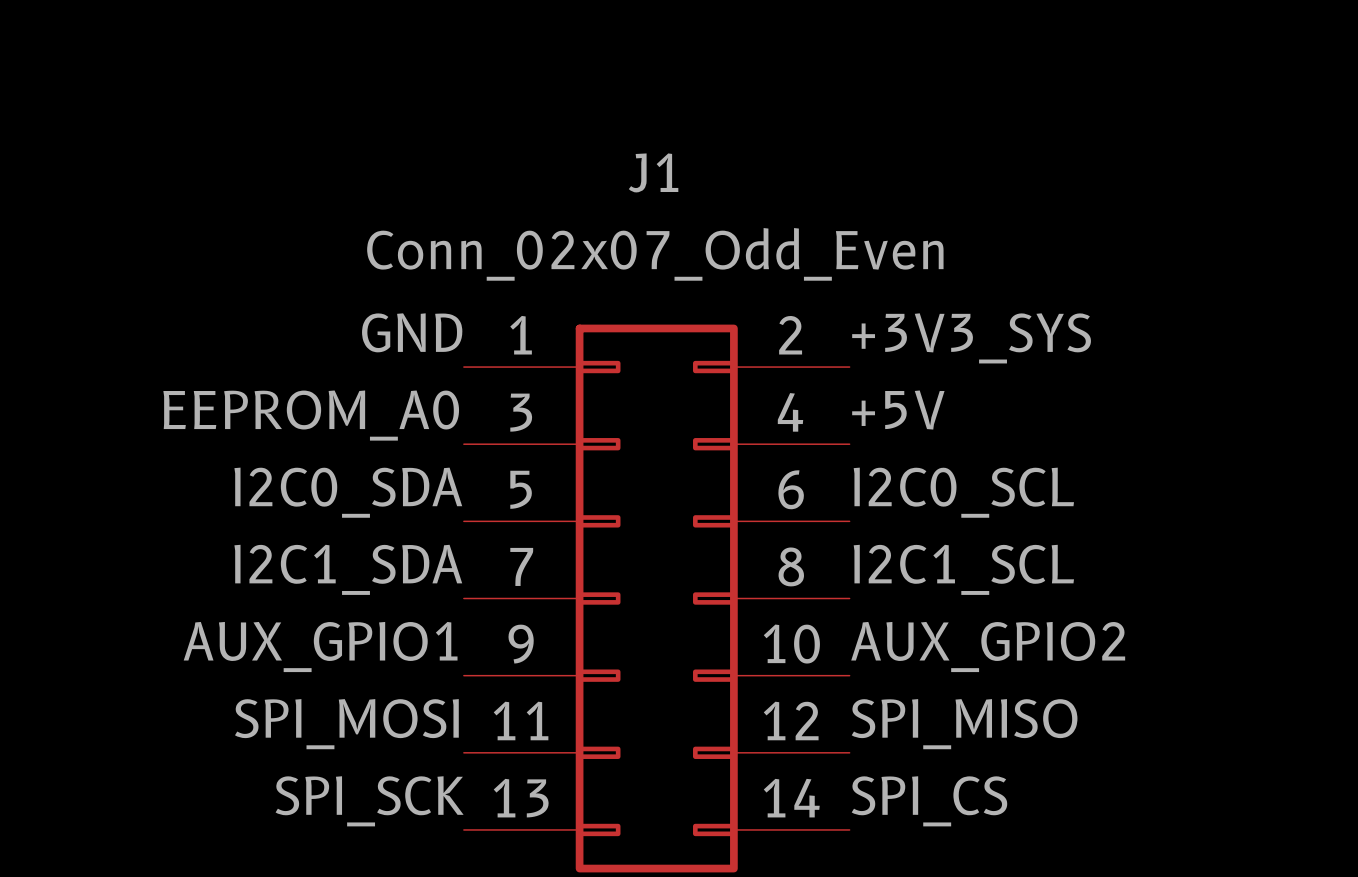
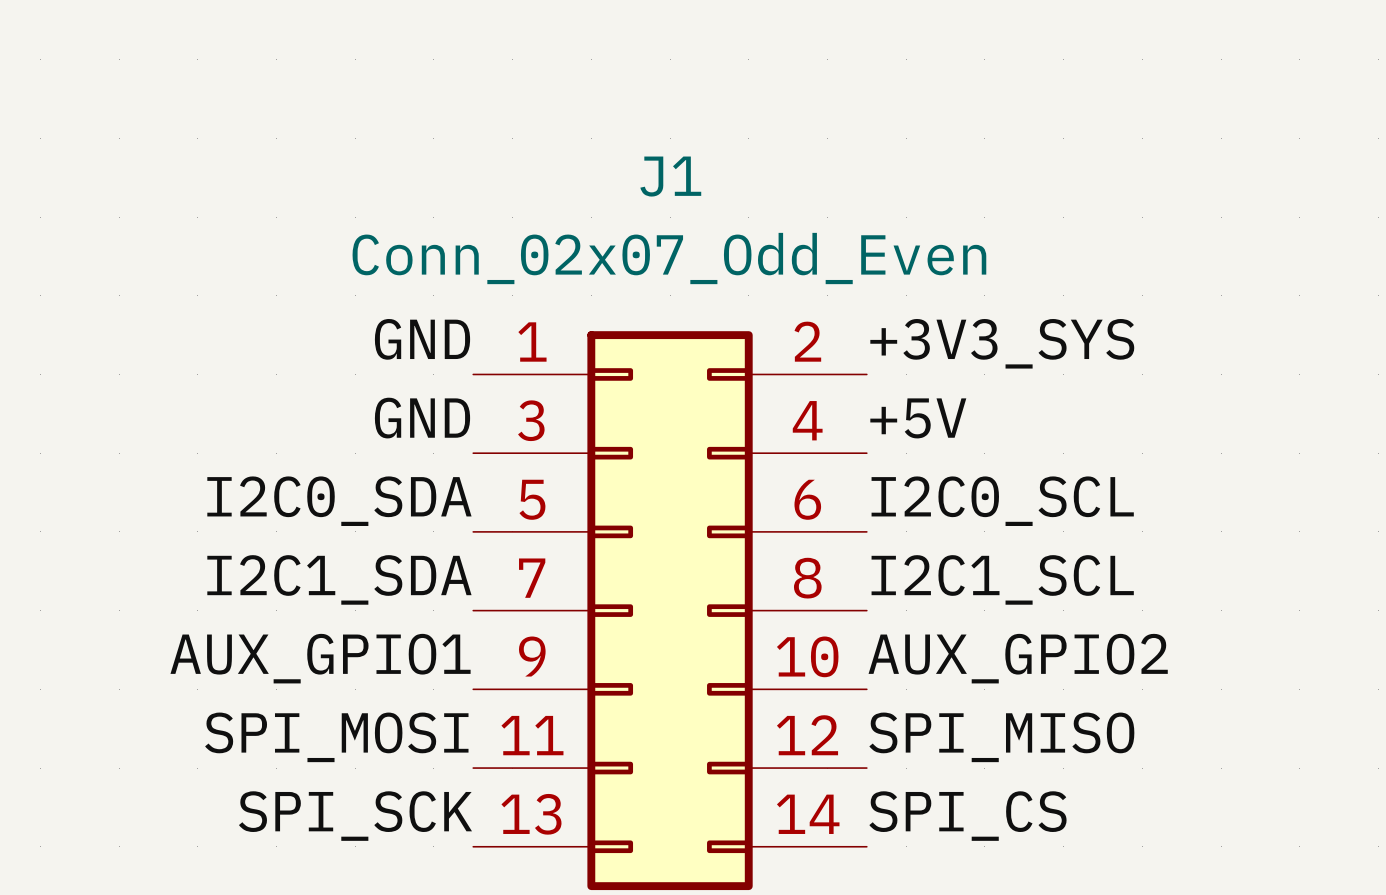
label: EEPROM_A0 (311, 415) -> GND (422, 418)

